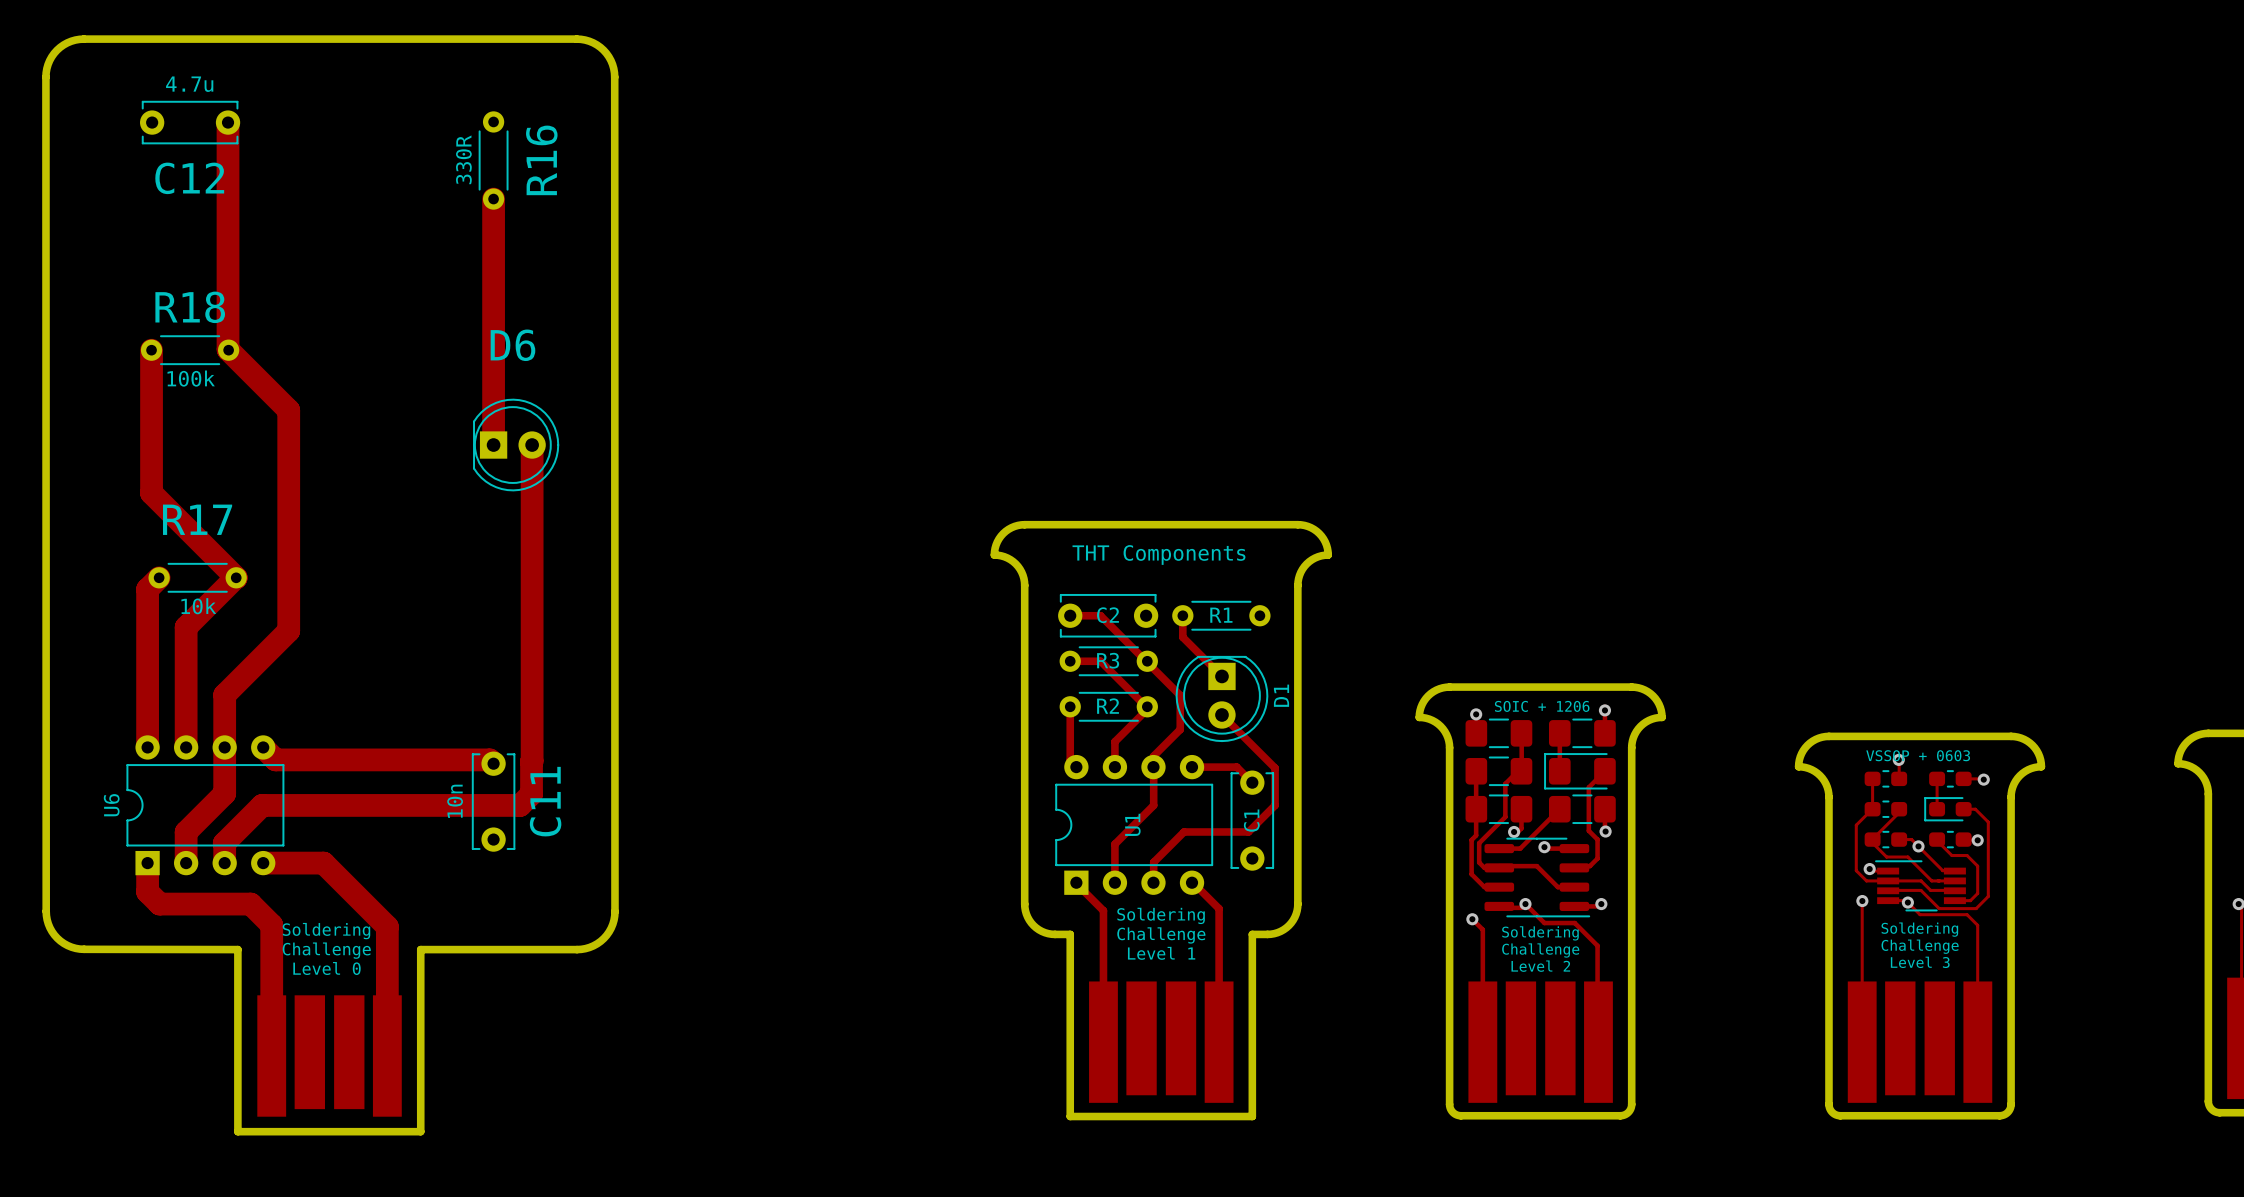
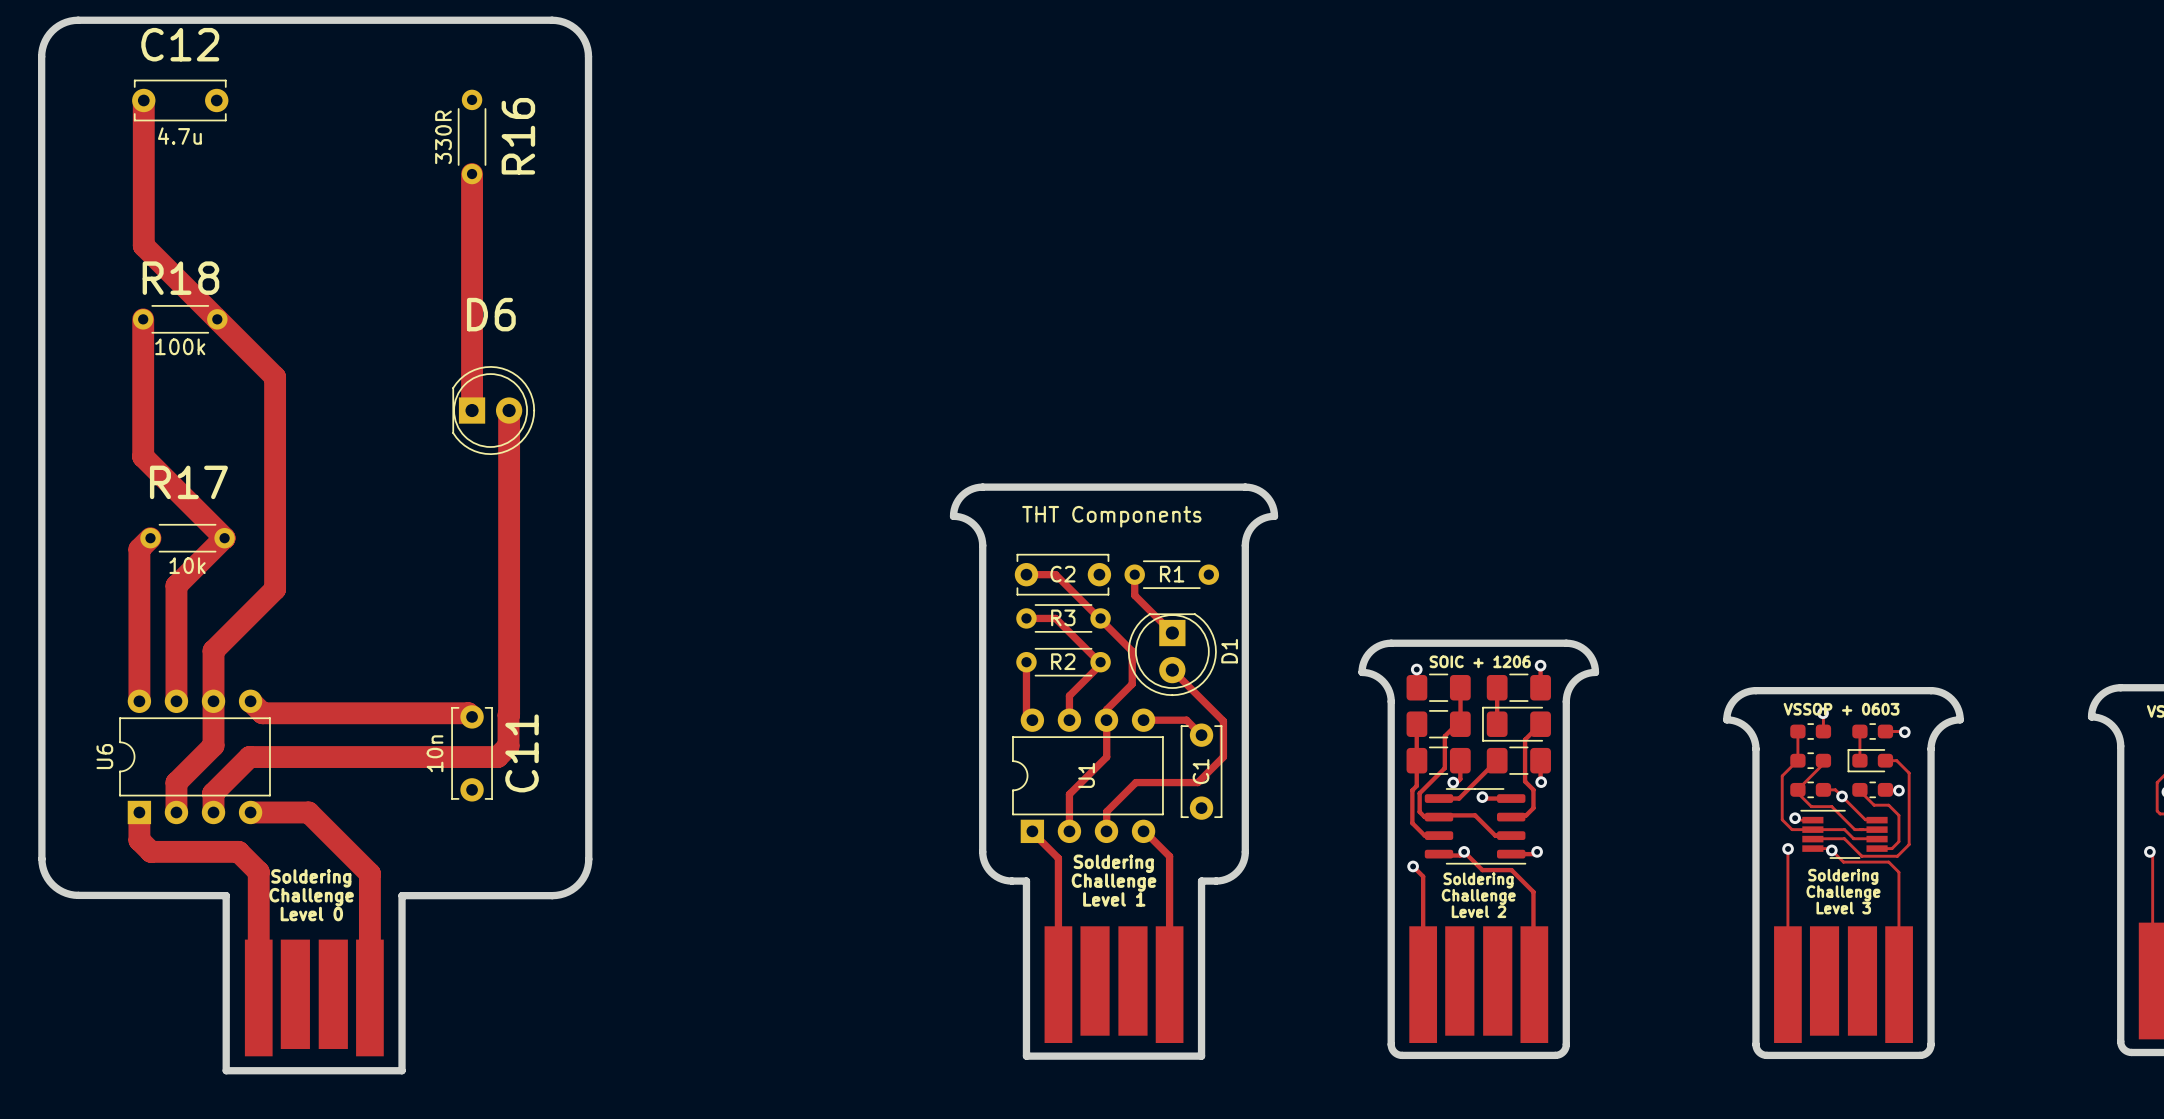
C12 value position: 4.7u (189, 84) -> 4.7u (179, 136)
track: (228, 122) (228, 349) -> (143, 101) (143, 245) (216, 318)
C12 name position: C12 (189, 178) -> C12 (180, 44)

